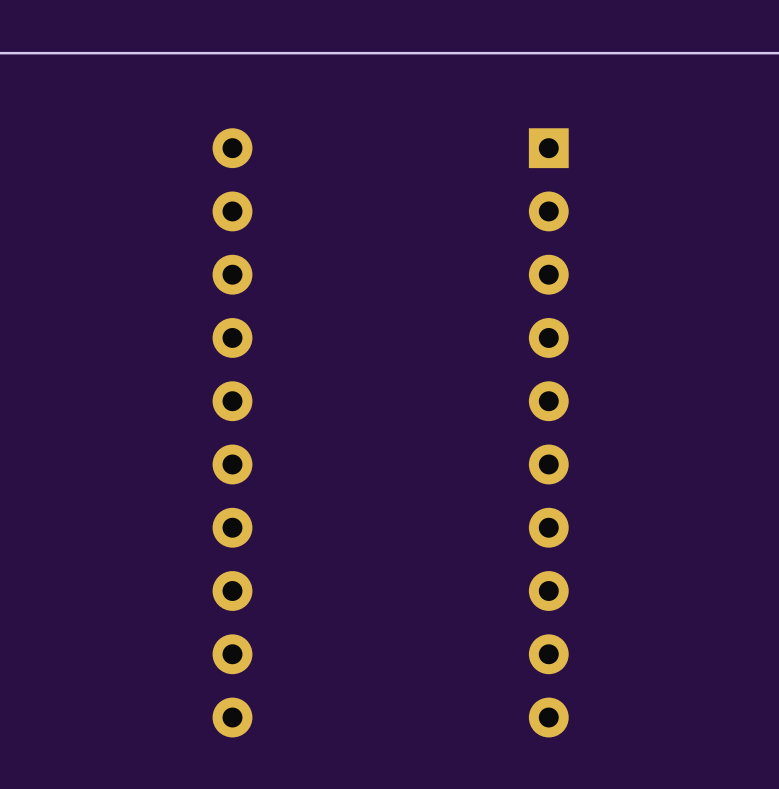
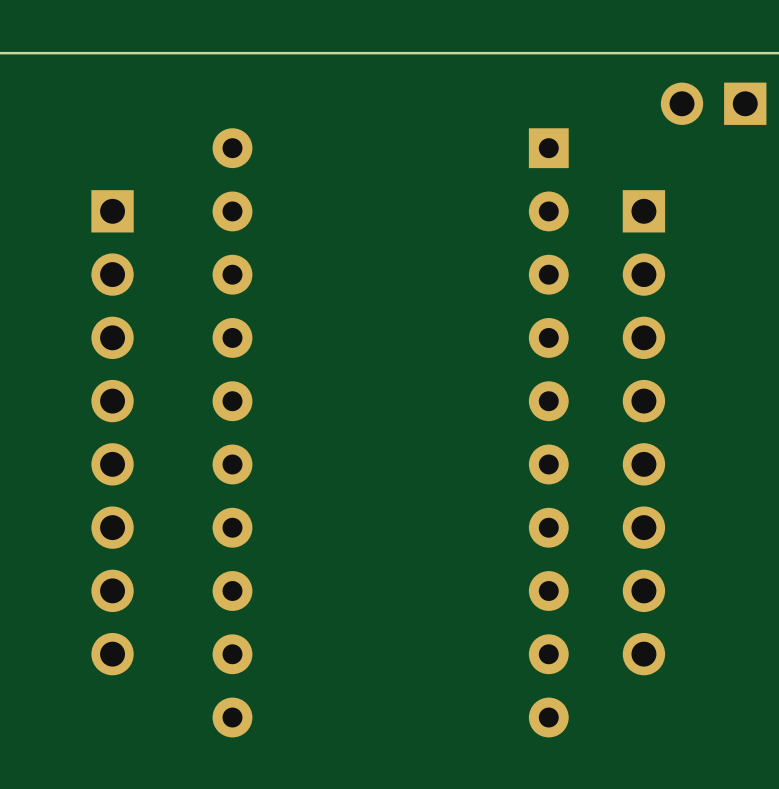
part: none -> (713, 103)
part: none -> (112, 432)
part: none -> (643, 432)

